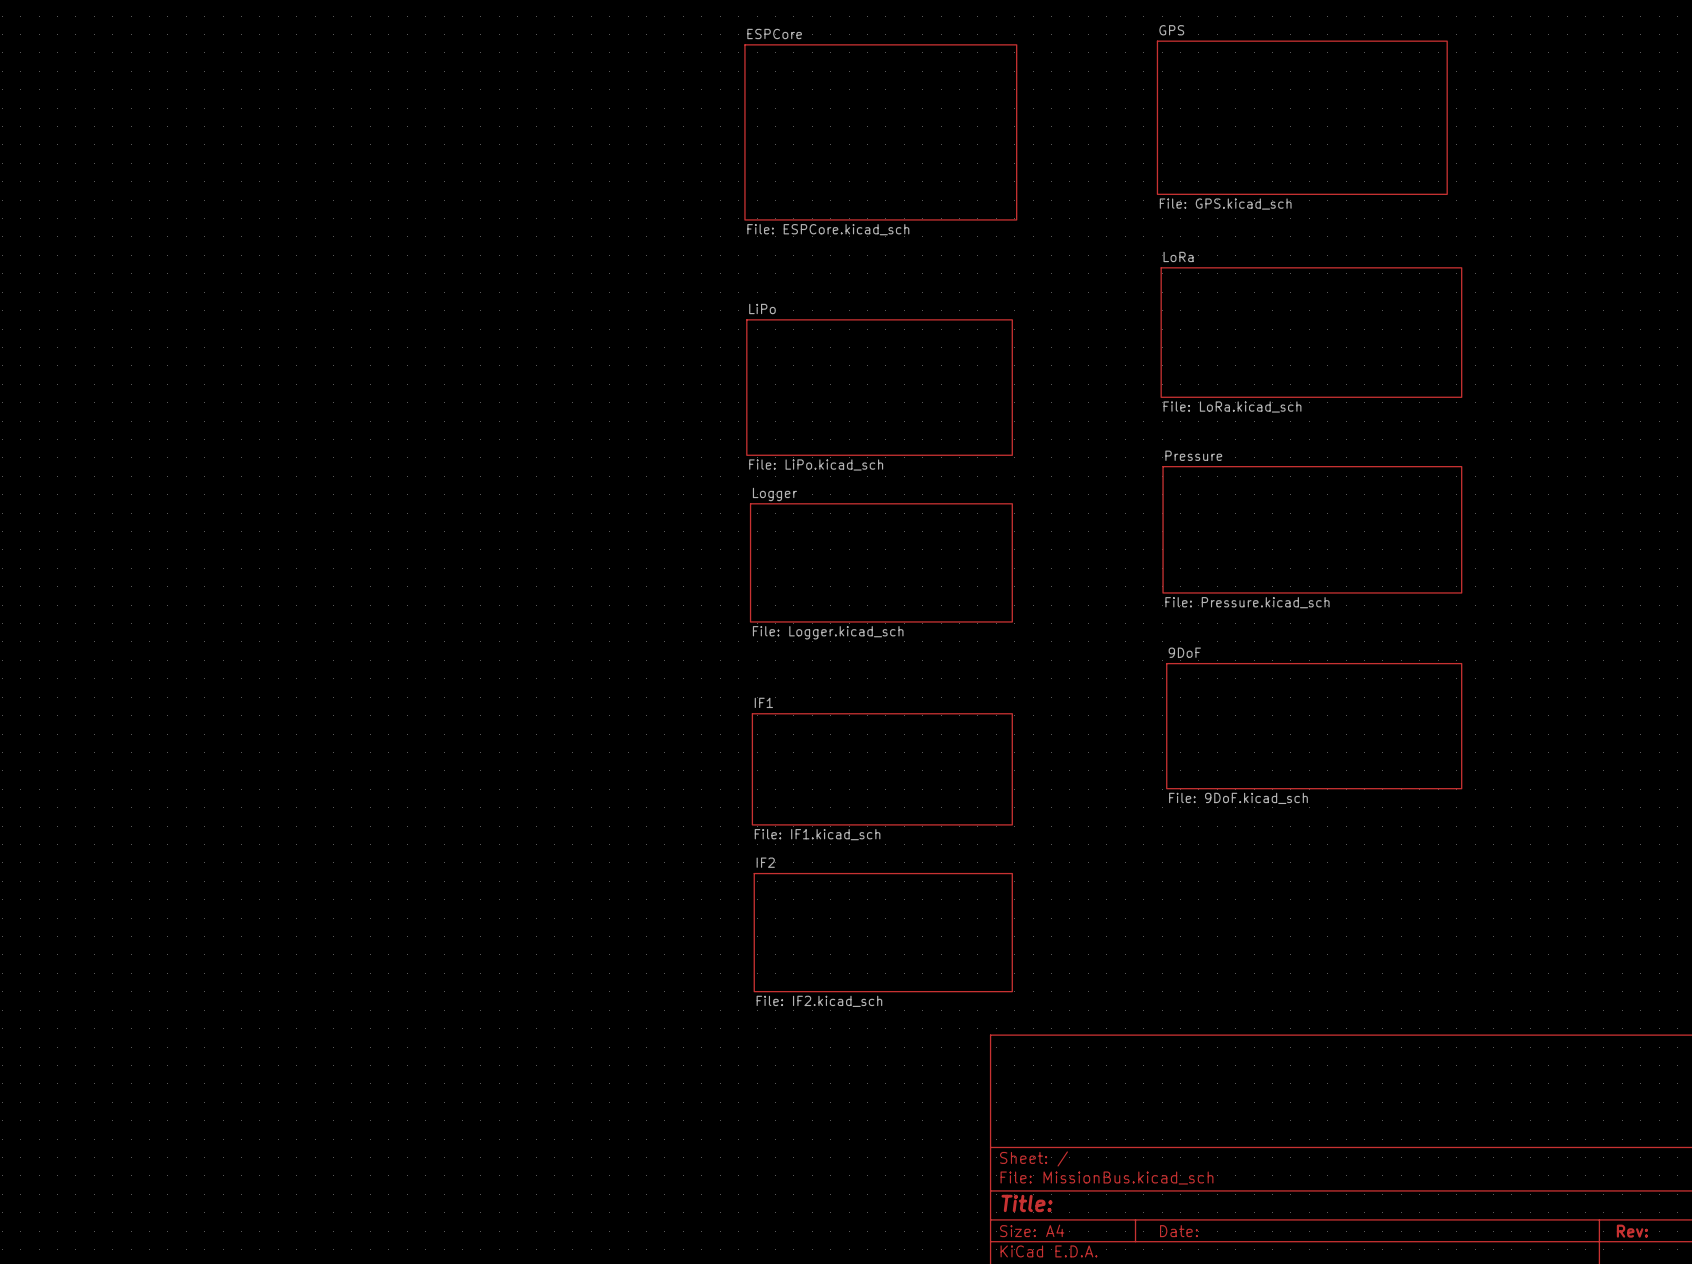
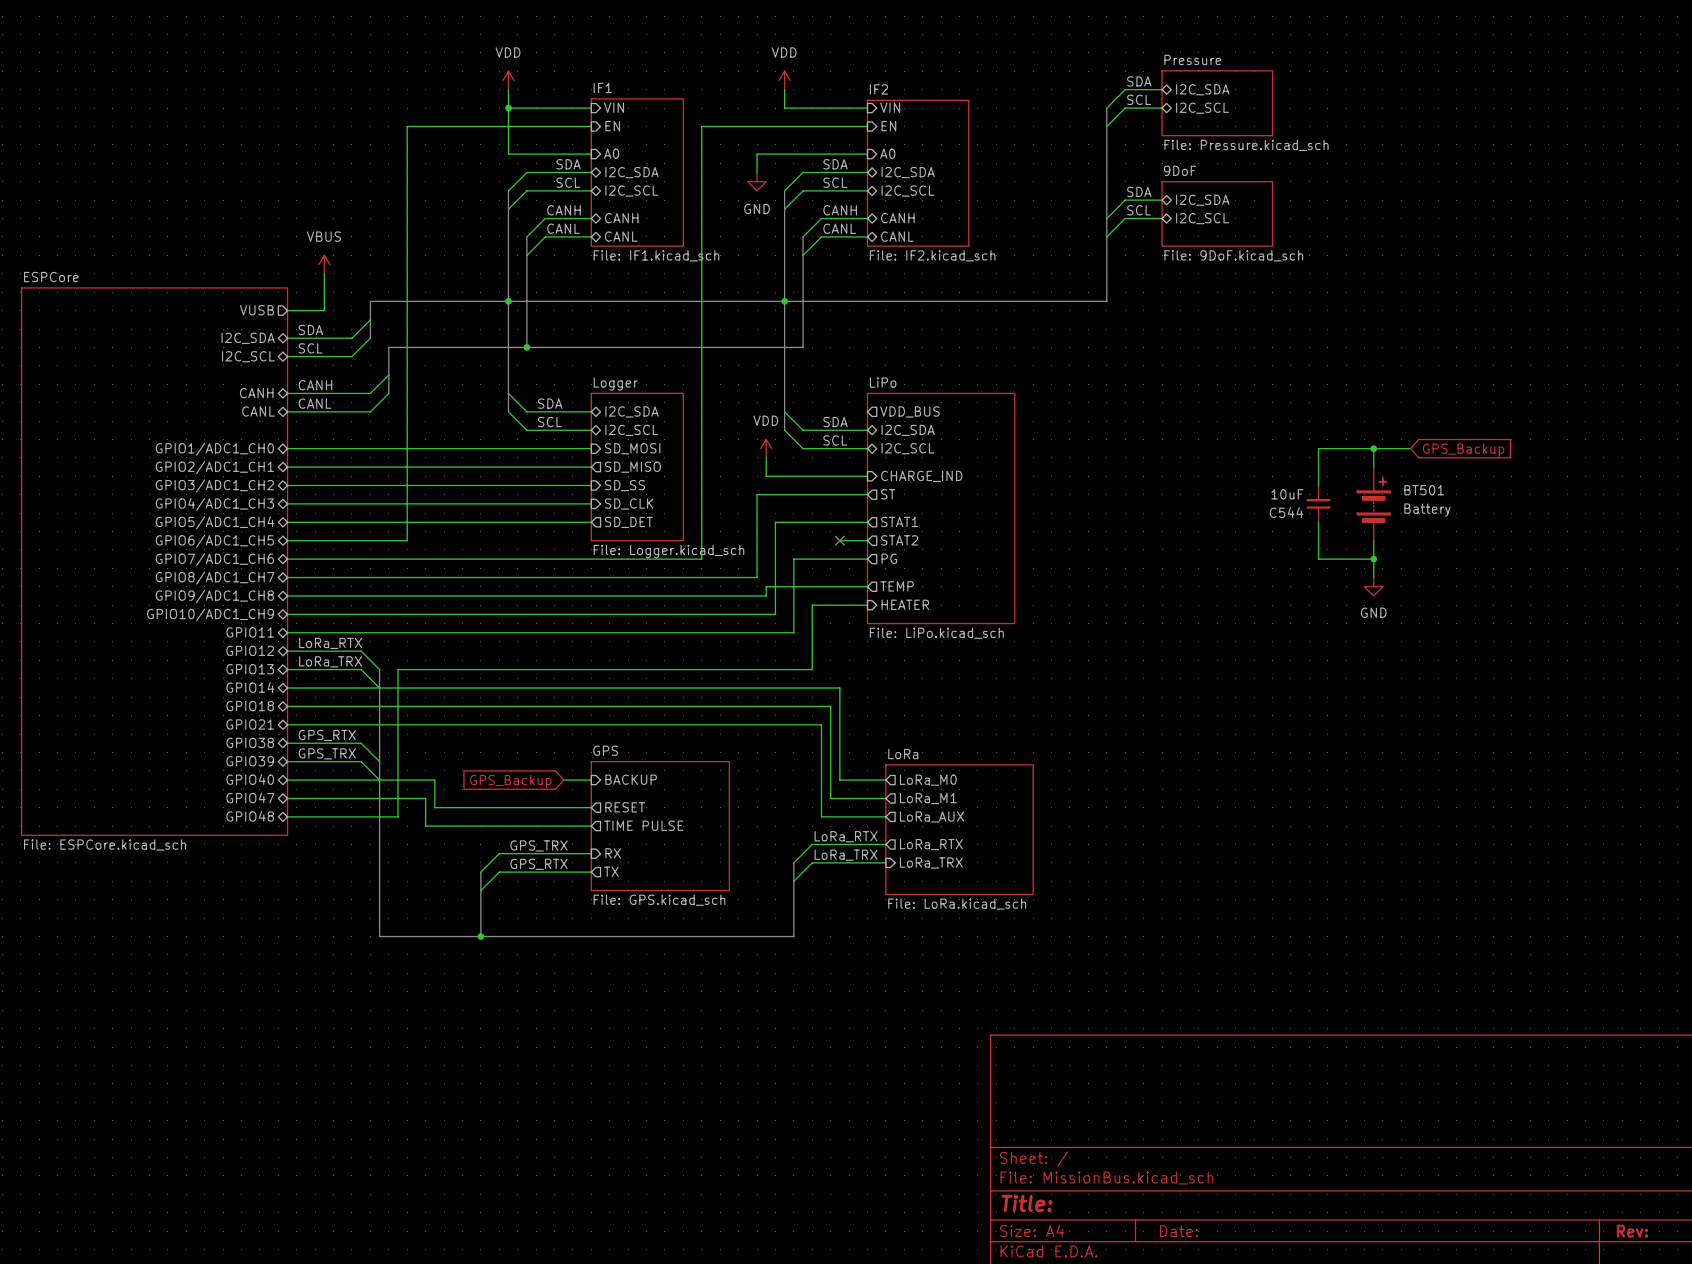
power symbol: none -> VDD (508, 80)
power symbol: none -> VDD (784, 80)
label: none -> SDA (1139, 81)
wire: none -> (508, 89) (508, 154) (591, 154)
wire: none -> (784, 89) (784, 108) (867, 108)
wire: none -> (1162, 89) (1125, 89) (1106, 108)
sheet pin: none -> I2C_SDA (1202, 89)
label: none -> SCL (1139, 99)
sheet Pressure: none -> File: Pressure.kicad_sch (1217, 103)
sheet pin: none -> VIN (614, 107)
sheet pin: none -> VIN (890, 107)
wire: none -> (508, 108) (591, 108)
junction: none -> (508, 108)
bus: none -> (1106, 108) (1106, 301) (370, 301) (370, 338)
wire: none -> (1162, 108) (1125, 108) (1106, 126)
sheet pin: none -> I2C_SCL (1202, 108)
sheet GPS: File: GPS.kicad_sch (1302, 117) -> none
wire: none -> (591, 126) (407, 126) (407, 540) (287, 540)
sheet pin: none -> EN (612, 126)
wire: none -> (867, 126) (701, 126) (701, 559) (287, 559)
sheet pin: none -> EN (888, 126)
sheet ESPCore: File: ESPCore.kicad_sch (880, 132) -> none
sheet pin: none -> A0 (611, 153)
sheet pin: none -> A0 (887, 153)
wire: none -> (867, 154) (757, 154) (757, 172)
label: none -> SDA (568, 164)
label: none -> SDA (835, 164)
wire: none -> (591, 172) (526, 172) (508, 190)
sheet pin: none -> I2C_SDA (632, 172)
wire: none -> (867, 172) (803, 172) (784, 190)
sheet pin: none -> I2C_SDA (908, 172)
power symbol: none -> GND (757, 181)
label: none -> SCL (568, 182)
label: none -> SCL (835, 182)
bus: none -> (508, 190) (508, 411)
wire: none -> (591, 190) (526, 190) (508, 209)
bus: none -> (784, 190) (784, 430)
wire: none -> (867, 190) (803, 190) (784, 209)
sheet pin: none -> I2C_SCL (631, 191)
sheet pin: none -> I2C_SCL (907, 191)
label: none -> SDA (1139, 191)
wire: none -> (1162, 200) (1125, 200) (1106, 218)
sheet pin: none -> I2C_SDA (1202, 200)
label: none -> CANH (563, 210)
label: none -> CANH (840, 210)
label: none -> SCL (1139, 210)
wire: none -> (591, 218) (545, 218) (526, 236)
sheet pin: none -> CANH (621, 218)
wire: none -> (867, 218) (821, 218) (803, 236)
sheet pin: none -> CANH (897, 218)
wire: none -> (1162, 218) (1125, 218) (1106, 236)
sheet pin: none -> I2C_SCL (1202, 218)
label: none -> CANL (563, 228)
label: none -> CANL (839, 228)
bus: none -> (526, 236) (526, 347)
wire: none -> (591, 236) (545, 236) (526, 255)
sheet pin: none -> CANL (621, 236)
bus: none -> (803, 236) (803, 347) (388, 347) (388, 393)
wire: none -> (867, 236) (821, 236) (803, 255)
sheet pin: none -> CANL (897, 236)
power symbol: none -> VBUS (324, 264)
wire: none -> (324, 273) (324, 310) (287, 310)
junction: none -> (508, 301)
junction: none -> (784, 301)
sheet pin: none -> VUSB (256, 310)
wire: none -> (370, 319) (351, 338) (287, 338)
label: none -> SDA (310, 329)
sheet LoRa: File: LoRa.kicad_sch (1311, 332) -> none
sheet pin: none -> I2C_SDA (248, 338)
wire: none -> (370, 338) (351, 356) (287, 356)
junction: none -> (526, 347)
label: none -> SCL (310, 348)
sheet pin: none -> I2C_SCL (248, 356)
wire: none -> (388, 375) (370, 393) (287, 393)
label: none -> CANH (315, 385)
sheet LiPo: File: LiPo.kicad_sch (879, 387) -> none
sheet pin: none -> CANH (256, 393)
wire: none -> (388, 393) (370, 411) (287, 411)
wire: none -> (508, 393) (526, 411) (591, 411)
label: none -> CANL (315, 403)
label: none -> SDA (550, 403)
sheet pin: none -> CANL (258, 411)
wire: none -> (508, 411) (526, 430) (591, 430)
sheet pin: none -> I2C_SDA (632, 411)
wire: none -> (784, 411) (803, 430) (867, 430)
sheet pin: none -> VDD_BUS (909, 411)
label: none -> SCL (549, 422)
label: none -> SDA (835, 422)
sheet pin: none -> I2C_SCL (631, 430)
wire: none -> (784, 430) (803, 448) (867, 448)
sheet pin: none -> I2C_SDA (908, 430)
label: none -> SCL (835, 440)
wire: none -> (287, 448) (591, 448)
sheet pin: none -> SD_MOSI (632, 448)
power symbol: none -> VDD (766, 448)
sheet pin: none -> I2C_SCL (907, 448)
wire: none -> (1373, 448) (1373, 467)
junction: none -> (1373, 448)
wire: none -> (1410, 448) (1318, 448) (1318, 485)
sheet pin: none -> GPIO1/ADC1_CH0 (214, 449)
global label: none -> GPS_Backup (1463, 450)
wire: none -> (766, 457) (766, 476) (867, 476)
sheet pin: none -> GPIO2/ADC1_CH1 (214, 467)
wire: none -> (287, 467) (591, 467)
sheet pin: none -> SD_MISO (632, 467)
sheet Logger: none -> File: Logger.kicad_sch (637, 467)
sheet pin: none -> CHARGE_IND (921, 476)
wire: none -> (287, 485) (591, 485)
sheet pin: none -> SD_SS (624, 485)
sheet pin: none -> GPIO3/ADC1_CH2 (214, 486)
wire: none -> (867, 494) (757, 494) (757, 577) (287, 577)
sheet pin: none -> ST (888, 494)
wire: none -> (287, 503) (591, 503)
sheet pin: none -> SD_CLK (629, 503)
C544: none -> 10uF (1318, 503)
BT501: none -> Battery (1373, 503)
sheet pin: none -> GPIO4/ADC1_CH3 (214, 504)
sheet LiPo: none -> File: LiPo.kicad_sch (941, 508)
sheet pin: none -> STAT1 (899, 521)
sheet pin: none -> GPIO5/ADC1_CH4 (215, 522)
wire: none -> (287, 522) (591, 522)
sheet pin: none -> SD_DET (628, 522)
wire: none -> (867, 522) (775, 522) (775, 614) (287, 614)
wire: none -> (1318, 522) (1318, 559) (1373, 559)
sheet Pressure: File: Pressure.kicad_sch (1312, 529) -> none
wire: none -> (839, 540) (867, 540)
no-connect mark: none -> (839, 540)
sheet pin: none -> STAT2 (899, 540)
wire: none -> (1373, 540) (1373, 577)
sheet pin: none -> GPIO6/ADC1_CH5 (214, 541)
sheet pin: none -> PG (889, 558)
sheet pin: none -> GPIO7/ADC1_CH6 (214, 559)
wire: none -> (867, 559) (793, 559) (793, 632) (287, 632)
junction: none -> (1373, 559)
sheet ESPCore: none -> File: ESPCore.kicad_sch (154, 561)
sheet Logger: File: Logger.kicad_sch (881, 562) -> none
sheet pin: none -> GPIO8/ADC1_CH7 (215, 578)
wire: none -> (867, 586) (766, 586) (766, 595) (287, 595)
sheet pin: none -> TEMP (896, 586)
power symbol: none -> GND (1373, 586)
sheet pin: none -> GPIO9/ADC1_CH8 (214, 596)
sheet pin: none -> HEATER (905, 604)
wire: none -> (867, 605) (812, 605) (812, 669) (398, 669) (398, 816) (287, 816)
sheet pin: none -> GPIO10/ADC1_CH9 (210, 614)
sheet pin: none -> GPIO11 (250, 632)
label: none -> LoRa_RTX (330, 643)
sheet pin: none -> GPIO12 (250, 650)
wire: none -> (287, 651) (361, 651) (379, 669)
sheet 9DoF name position: 9DoF (1184, 652) -> 9DoF (1180, 170)
label: none -> LoRa_TRX (330, 661)
sheet 9DoF shape: [1166, 663, 1463, 790] -> [1161, 181, 1274, 247]
sheet pin: none -> GPIO13 (250, 669)
wire: none -> (287, 669) (361, 669) (379, 688)
bus: none -> (379, 669) (379, 936) (793, 936) (793, 862)
sheet pin: none -> GPIO14 (250, 687)
wire: none -> (287, 688) (839, 688) (839, 780) (885, 780)
sheet IF1 name position: IF1 (763, 702) -> IF1 (602, 87)
sheet pin: none -> GPIO18 (250, 706)
wire: none -> (287, 706) (830, 706) (830, 798) (885, 798)
sheet IF1 shape: [751, 713, 1013, 826] -> [590, 98, 684, 247]
sheet pin: none -> GPIO21 (250, 724)
wire: none -> (287, 724) (821, 724) (821, 816) (885, 816)
label: none -> GPS_RTX (327, 735)
sheet pin: none -> GPIO38 (250, 742)
wire: none -> (287, 743) (361, 743) (379, 761)
label: none -> GPS_TRX (327, 753)
sheet pin: none -> GPIO39 (250, 761)
wire: none -> (287, 761) (361, 761) (379, 780)
sheet pin: none -> GPIO40 (250, 779)
sheet pin: none -> BACKUP (631, 779)
wire: none -> (287, 780) (434, 780) (434, 807) (591, 807)
wire: none -> (563, 780) (591, 780)
sheet pin: none -> LoRa_M0 (928, 780)
global label: none -> GPS_Backup (510, 781)
sheet pin: none -> GPIO47 (250, 797)
wire: none -> (287, 798) (425, 798) (425, 826) (591, 826)
sheet pin: none -> LoRa_M1 (928, 798)
sheet 9DoF value position: File: 9DoF.kicad_sch (1238, 798) -> File: 9DoF.kicad_sch (1233, 255)
sheet pin: none -> RESET (625, 807)
sheet pin: none -> GPIO48 (250, 816)
sheet pin: none -> LoRa_AUX (932, 816)
sheet pin: none -> TIME PULSE (643, 825)
sheet GPS: none -> File: GPS.kicad_sch (660, 826)
sheet LoRa: none -> File: LoRa.kicad_sch (959, 829)
sheet IF1 value position: File: IF1.kicad_sch (817, 834) -> File: IF1.kicad_sch (656, 255)
label: none -> LoRa_RTX (846, 836)
wire: none -> (885, 844) (812, 844) (793, 862)
sheet pin: none -> LoRa_RTX (931, 844)
label: none -> GPS_TRX (539, 845)
wire: none -> (591, 853) (499, 853) (480, 872)
sheet pin: none -> RX (613, 853)
label: none -> LoRa_TRX (846, 855)
sheet IF2 name position: IF2 (765, 862) -> IF2 (878, 89)
wire: none -> (885, 862) (812, 862) (793, 881)
sheet pin: none -> LoRa_TRX (931, 862)
label: none -> GPS_RTX (539, 864)
sheet pin: none -> TX (611, 871)
bus: none -> (480, 872) (480, 936)
wire: none -> (591, 872) (499, 872) (480, 890)
sheet IF2 shape: [753, 873, 1013, 993] -> [866, 99, 970, 247]
junction: none -> (480, 936)
sheet IF2 value position: File: IF2.kicad_sch (819, 1001) -> File: IF2.kicad_sch (932, 255)

